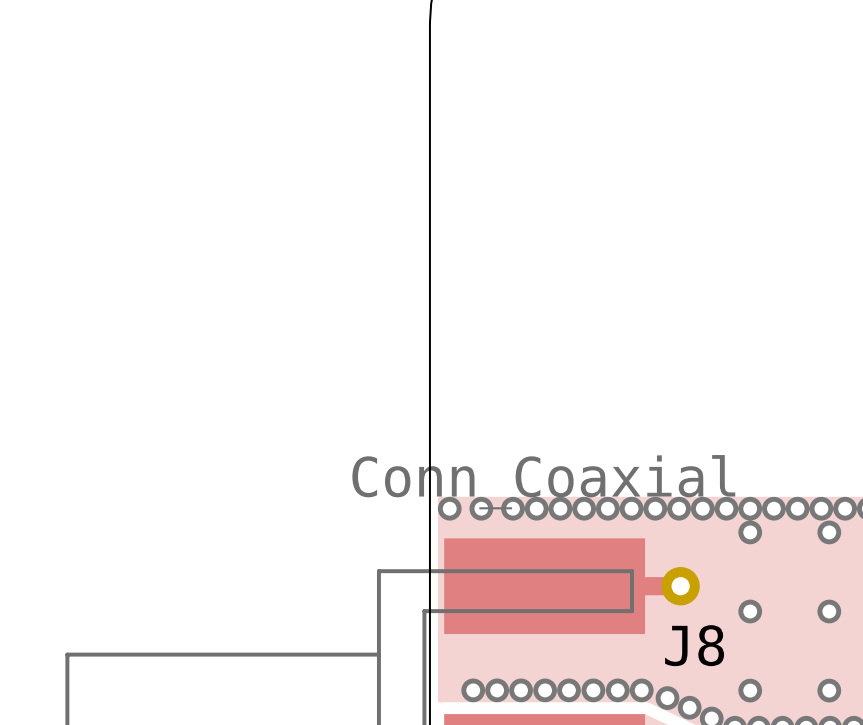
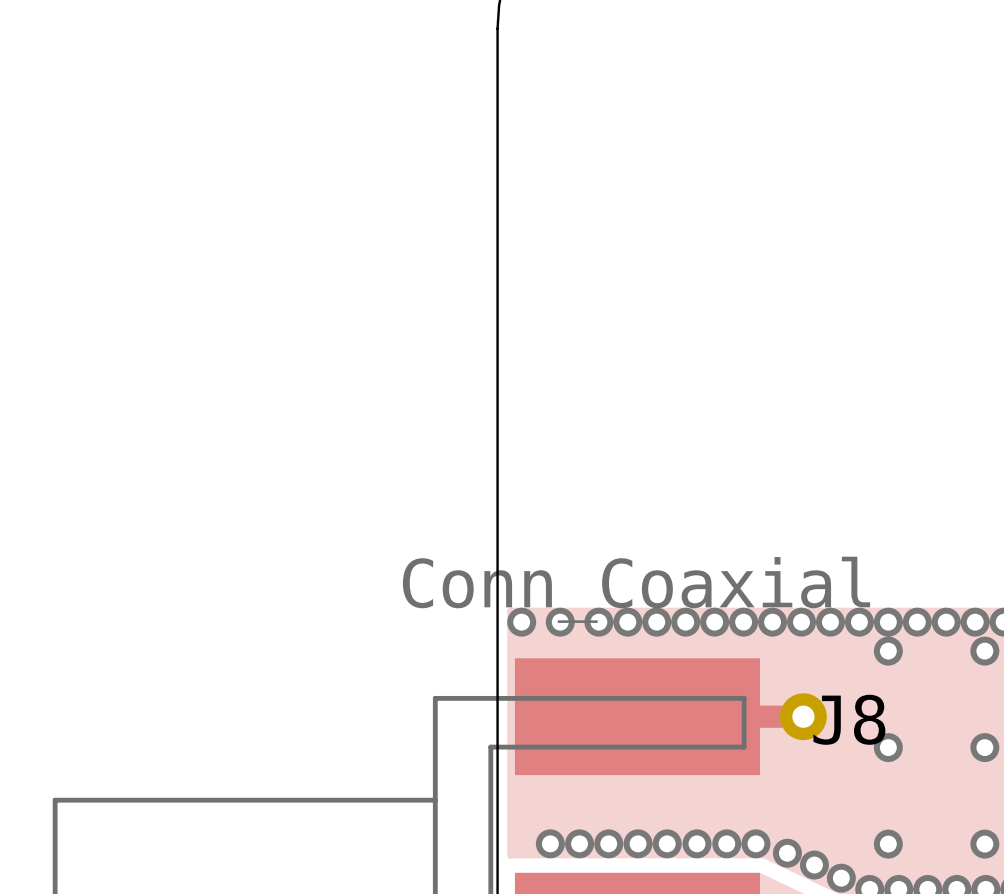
J8 name position: J8 (694, 645) -> J8 (849, 719)

